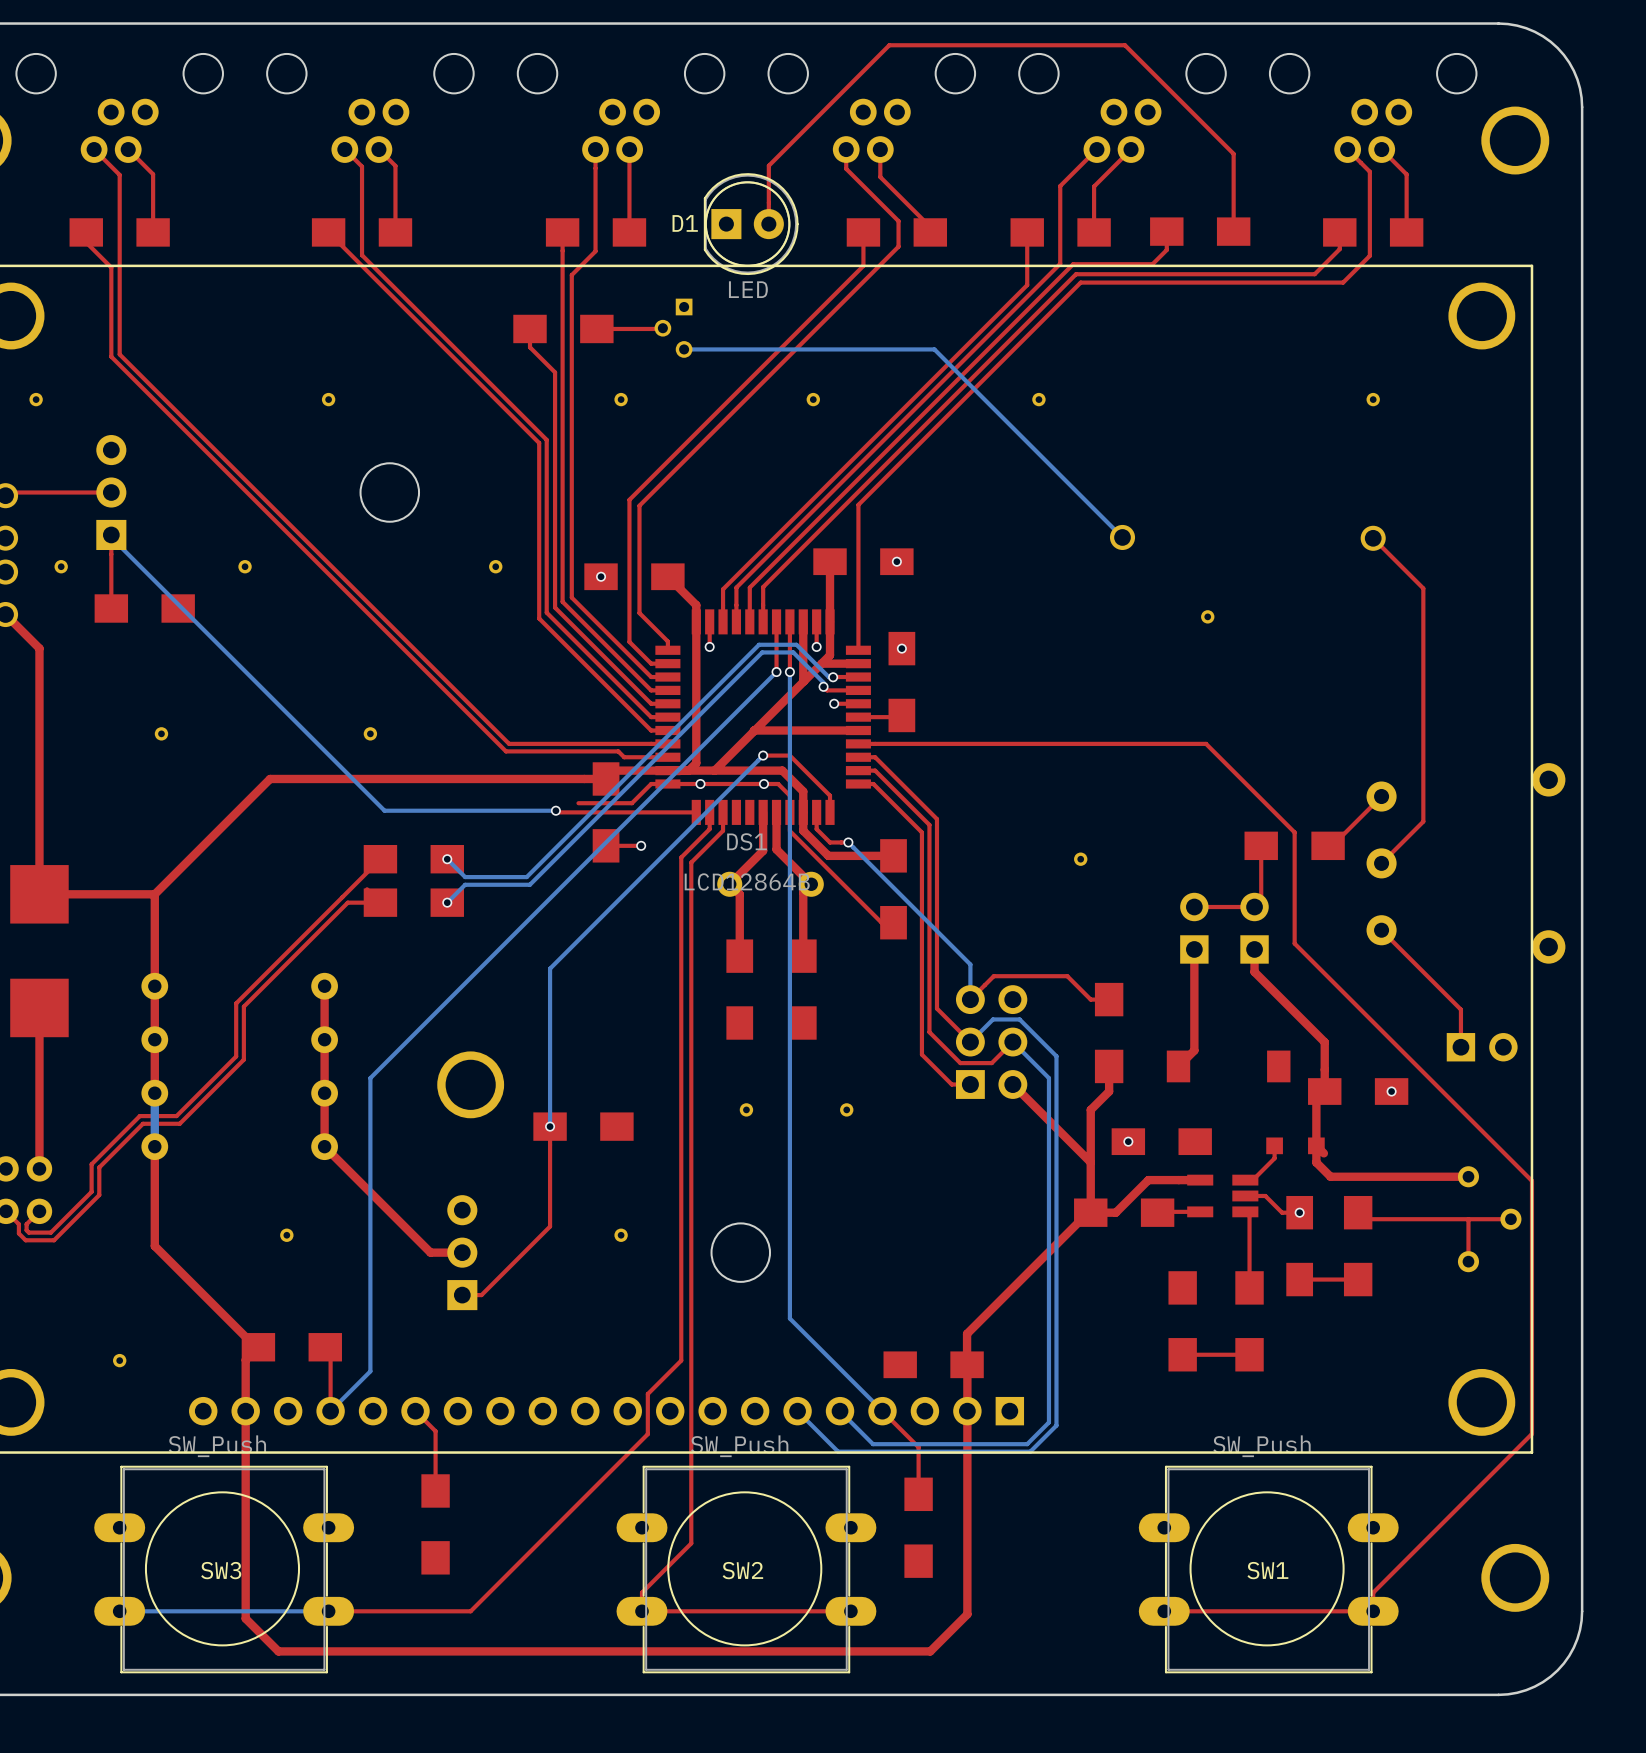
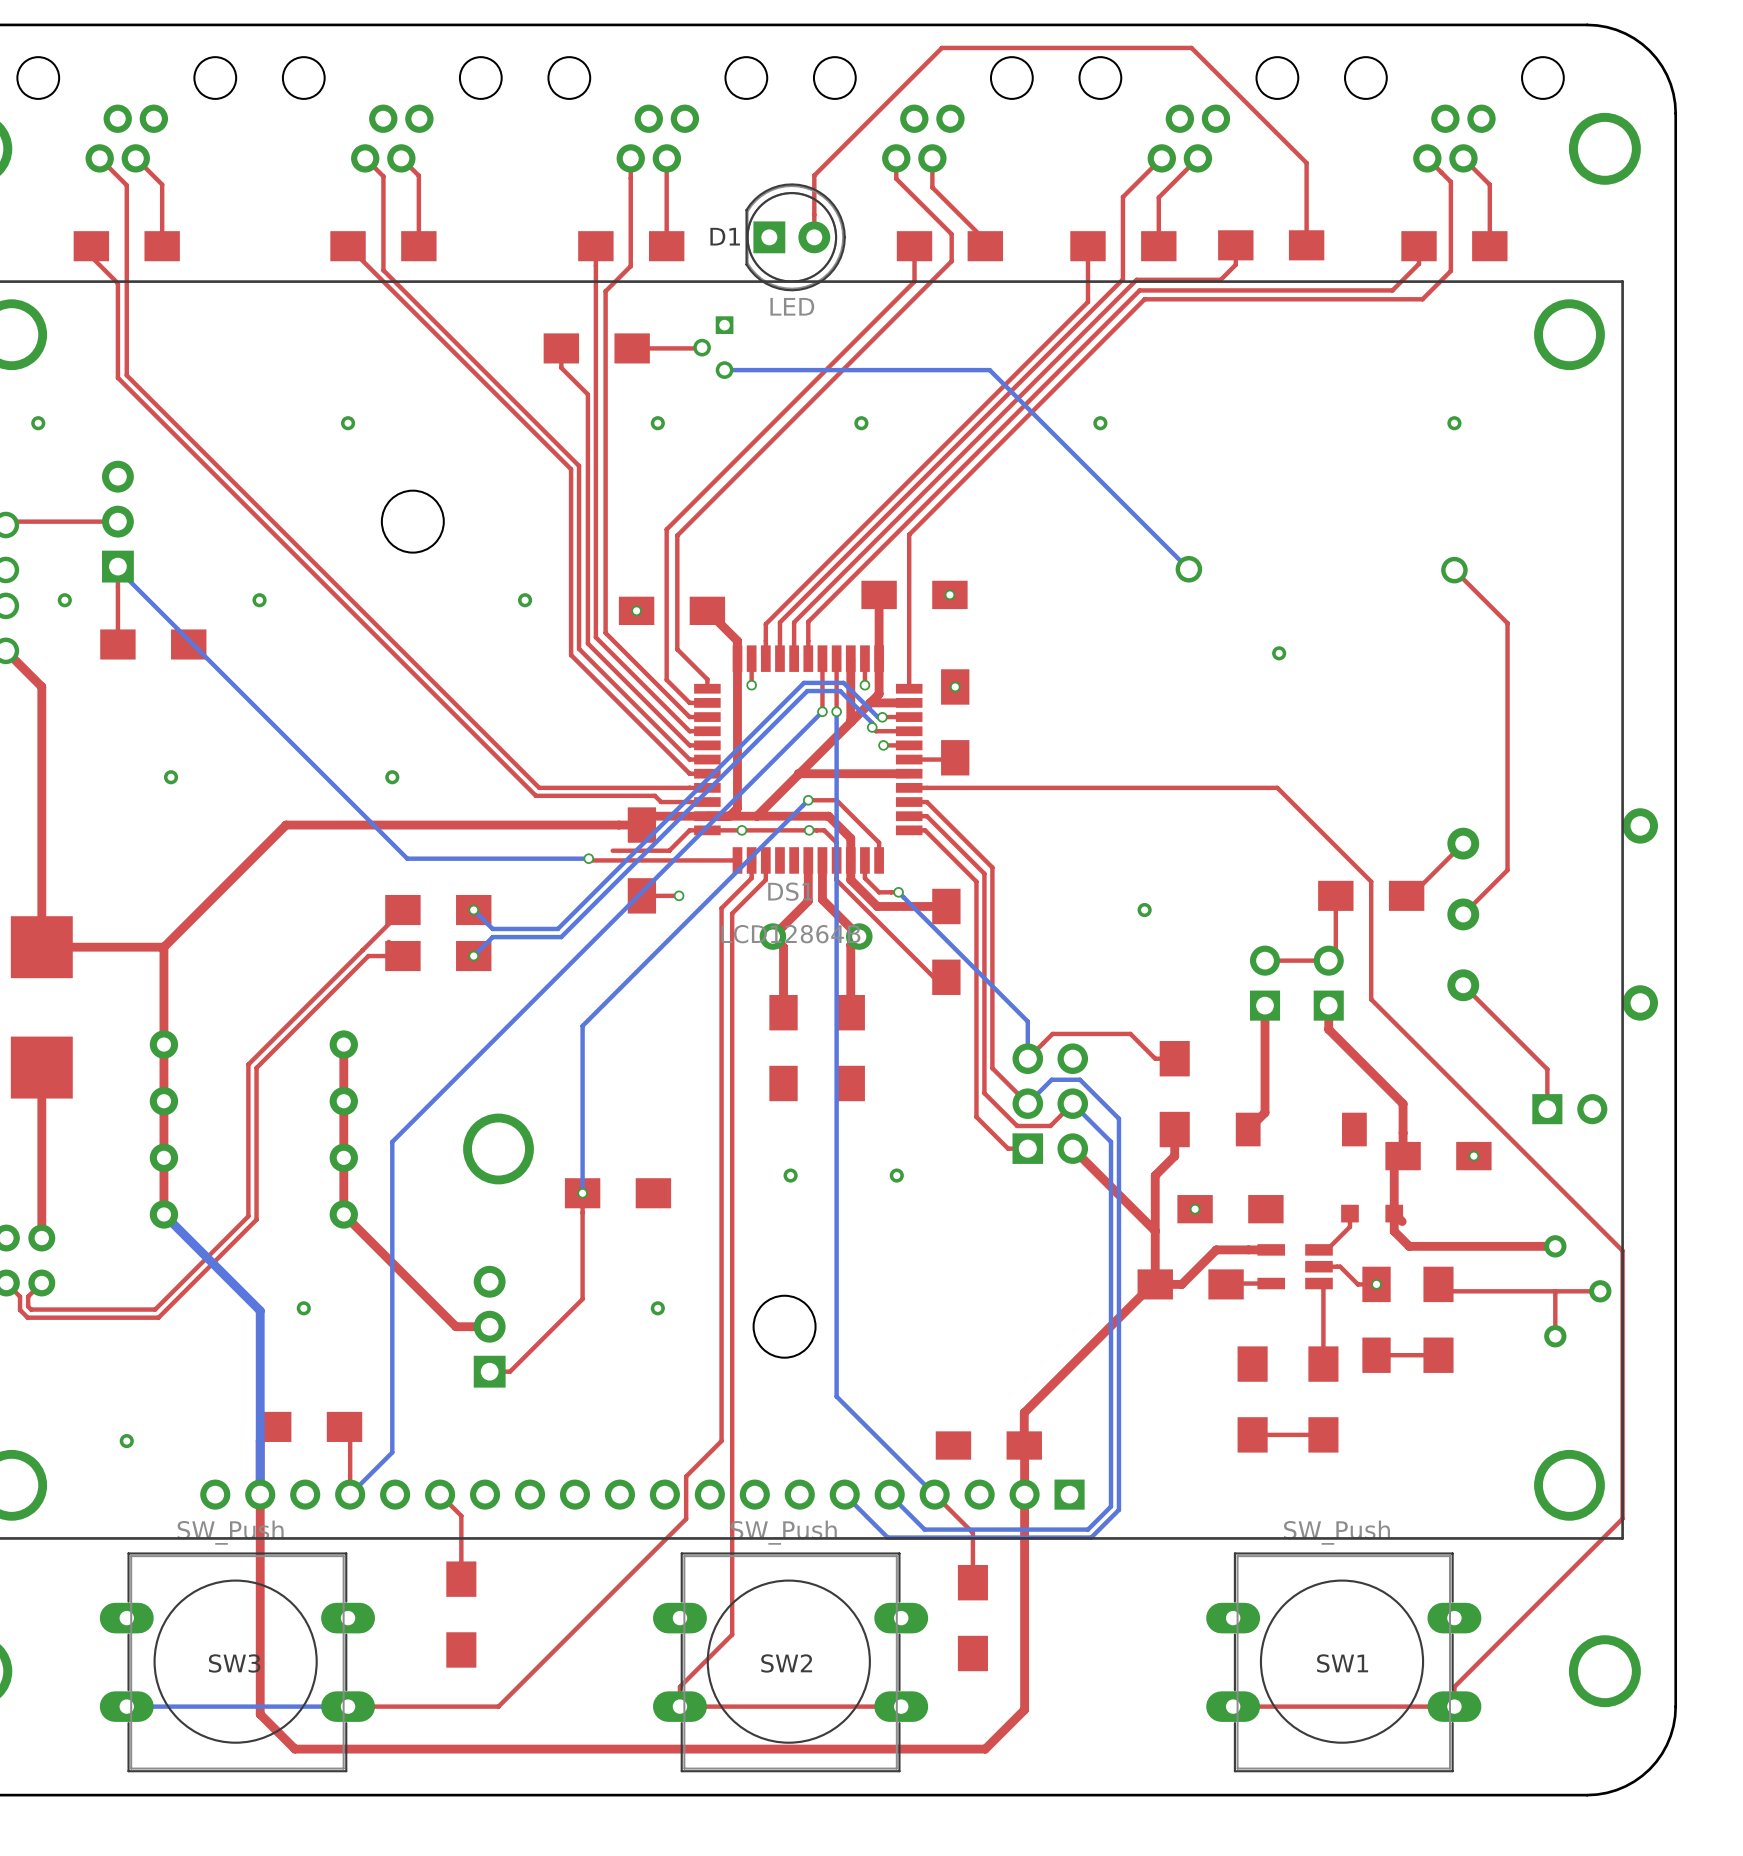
top track: (236, 1003) (236, 1056) (176, 1116) (139, 1116) (91, 1164) (91, 1191) (50, 1232) (28, 1232) (26, 1230) -> (250, 1062) (248, 1064) (248, 1216) (155, 1309) (31, 1309) (28, 1303)
top track: (243, 1006) (243, 1059) (179, 1123) (143, 1123) (99, 1167) (99, 1195) (54, 1240) (25, 1240) (18, 1233) -> (258, 1066) (256, 1067) (256, 1219) (158, 1317) (27, 1317) (20, 1310) (20, 1306)
bottom track: (154, 1093) (154, 1146) -> (260, 1494) (260, 1310) (163, 1214)
top track: (154, 1146) (154, 1246) (255, 1347) -> (163, 1214) (163, 1157)

